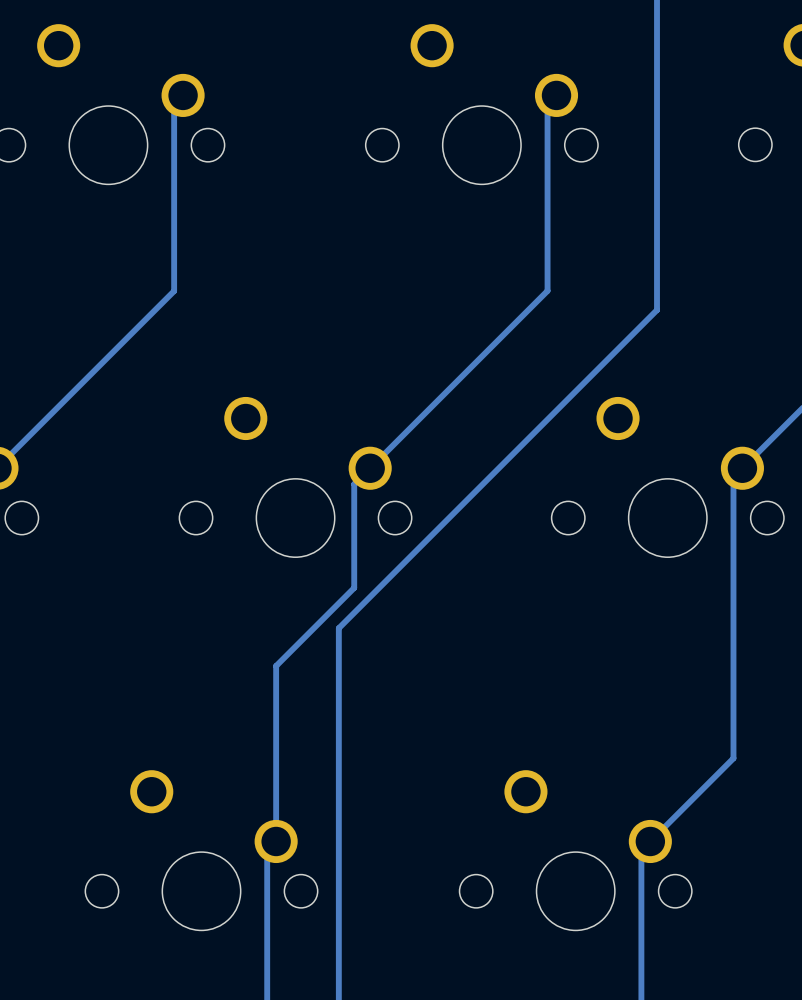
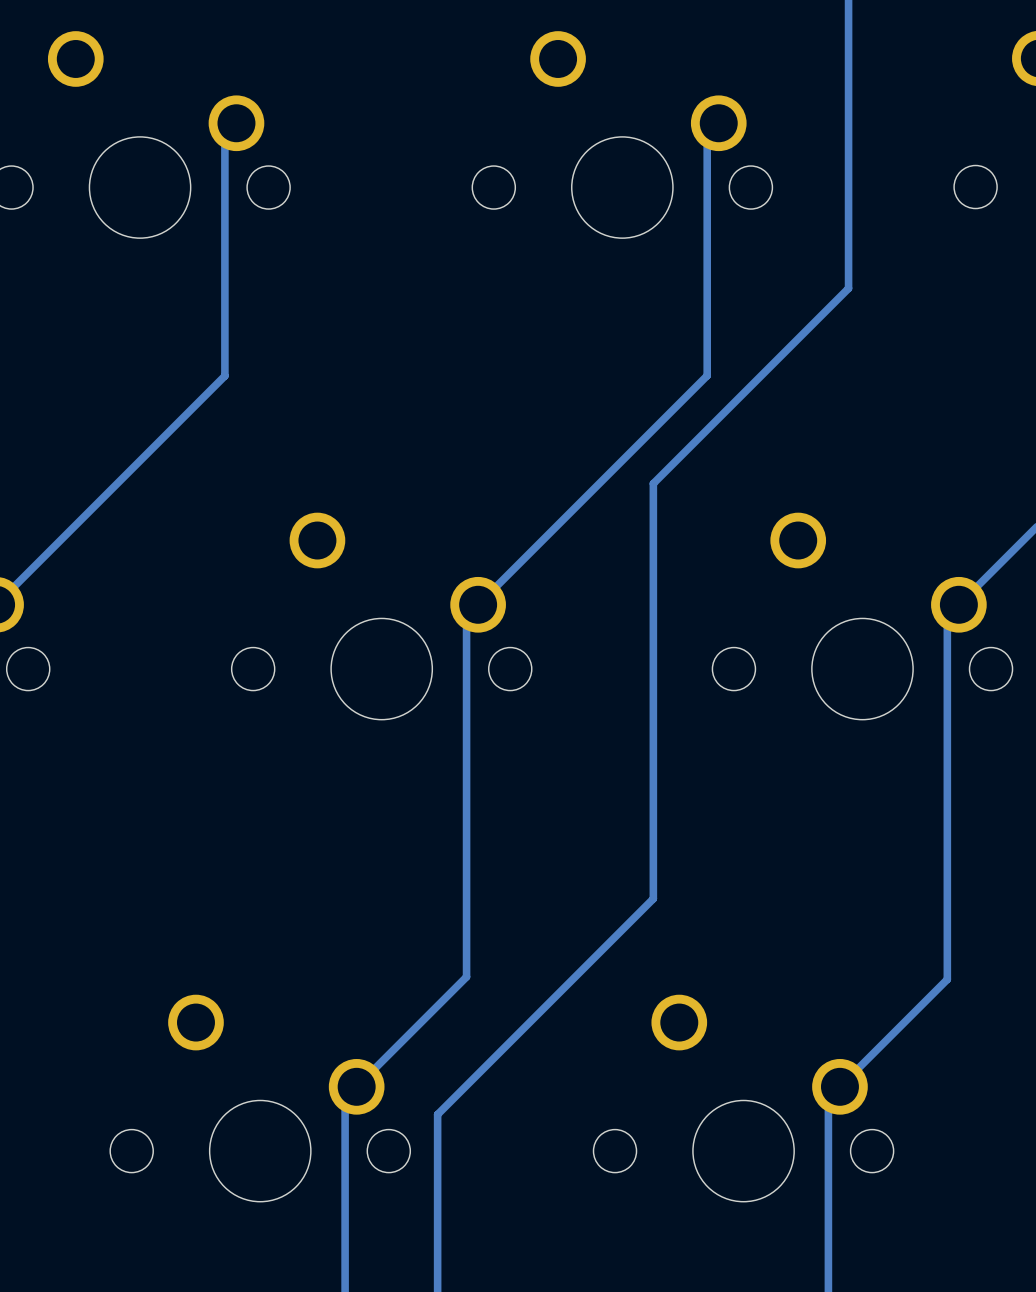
track: (657, 223) (657, 310) (338, 628) (338, 862) -> (848, 288) (653, 483) (653, 898) (437, 1114)
track: (361, 477) (354, 484) (354, 587) (276, 666) (276, 841) -> (466, 616) (466, 976) (356, 1086)

